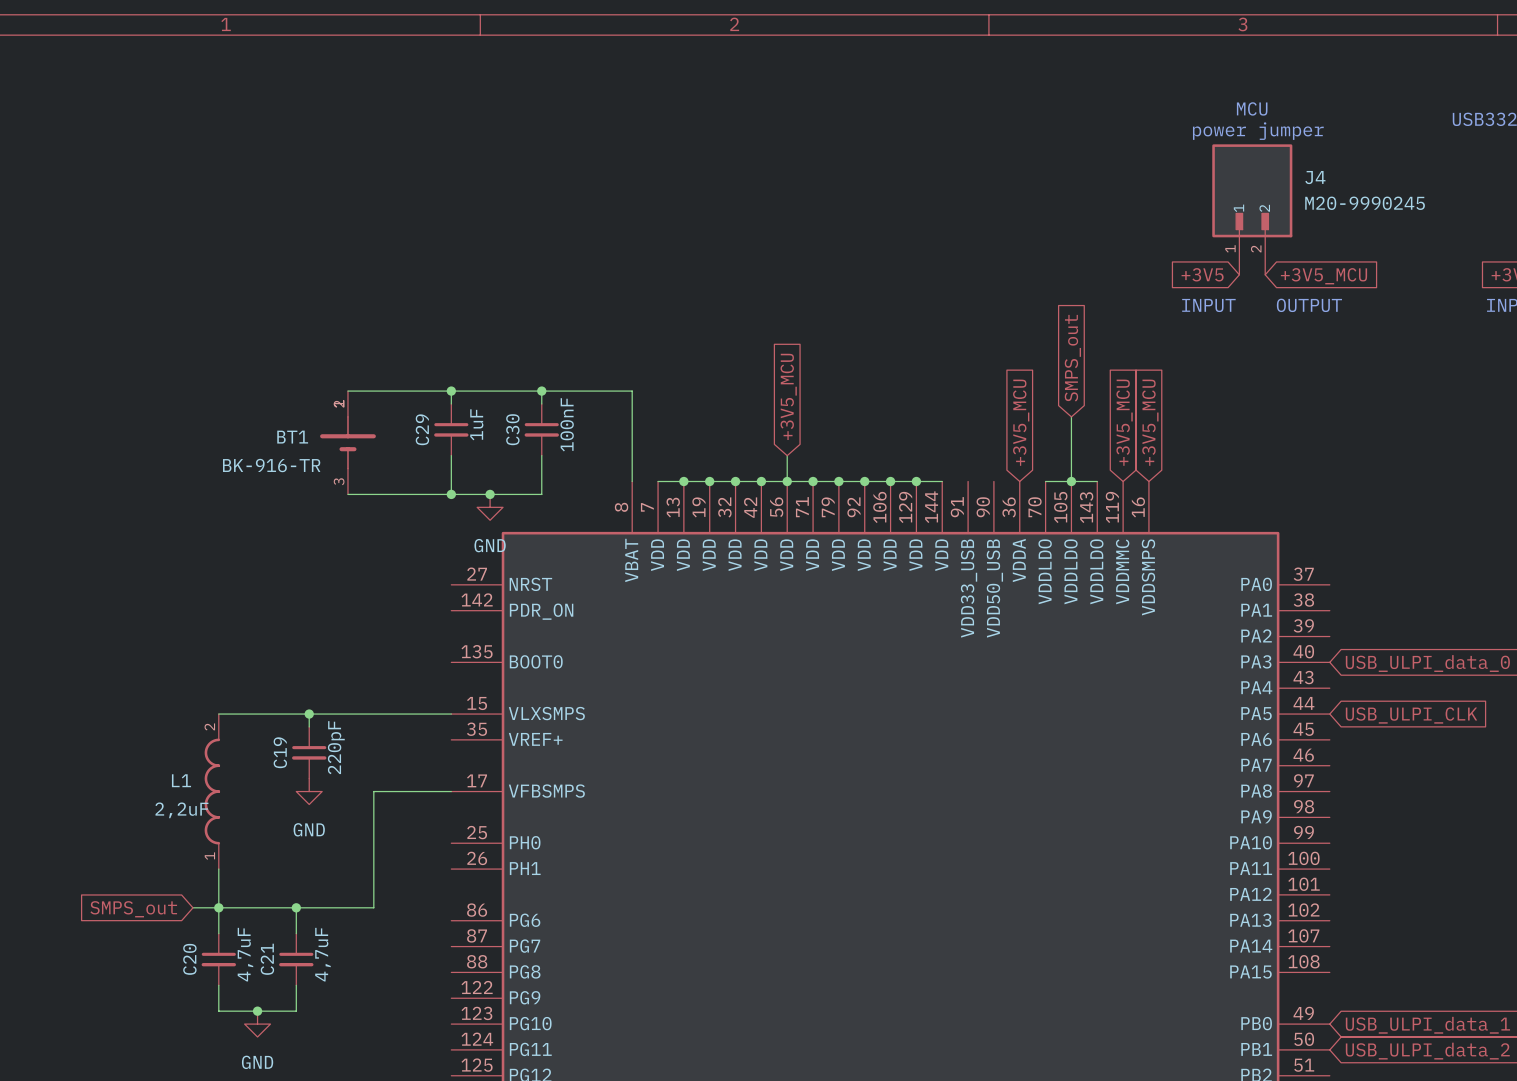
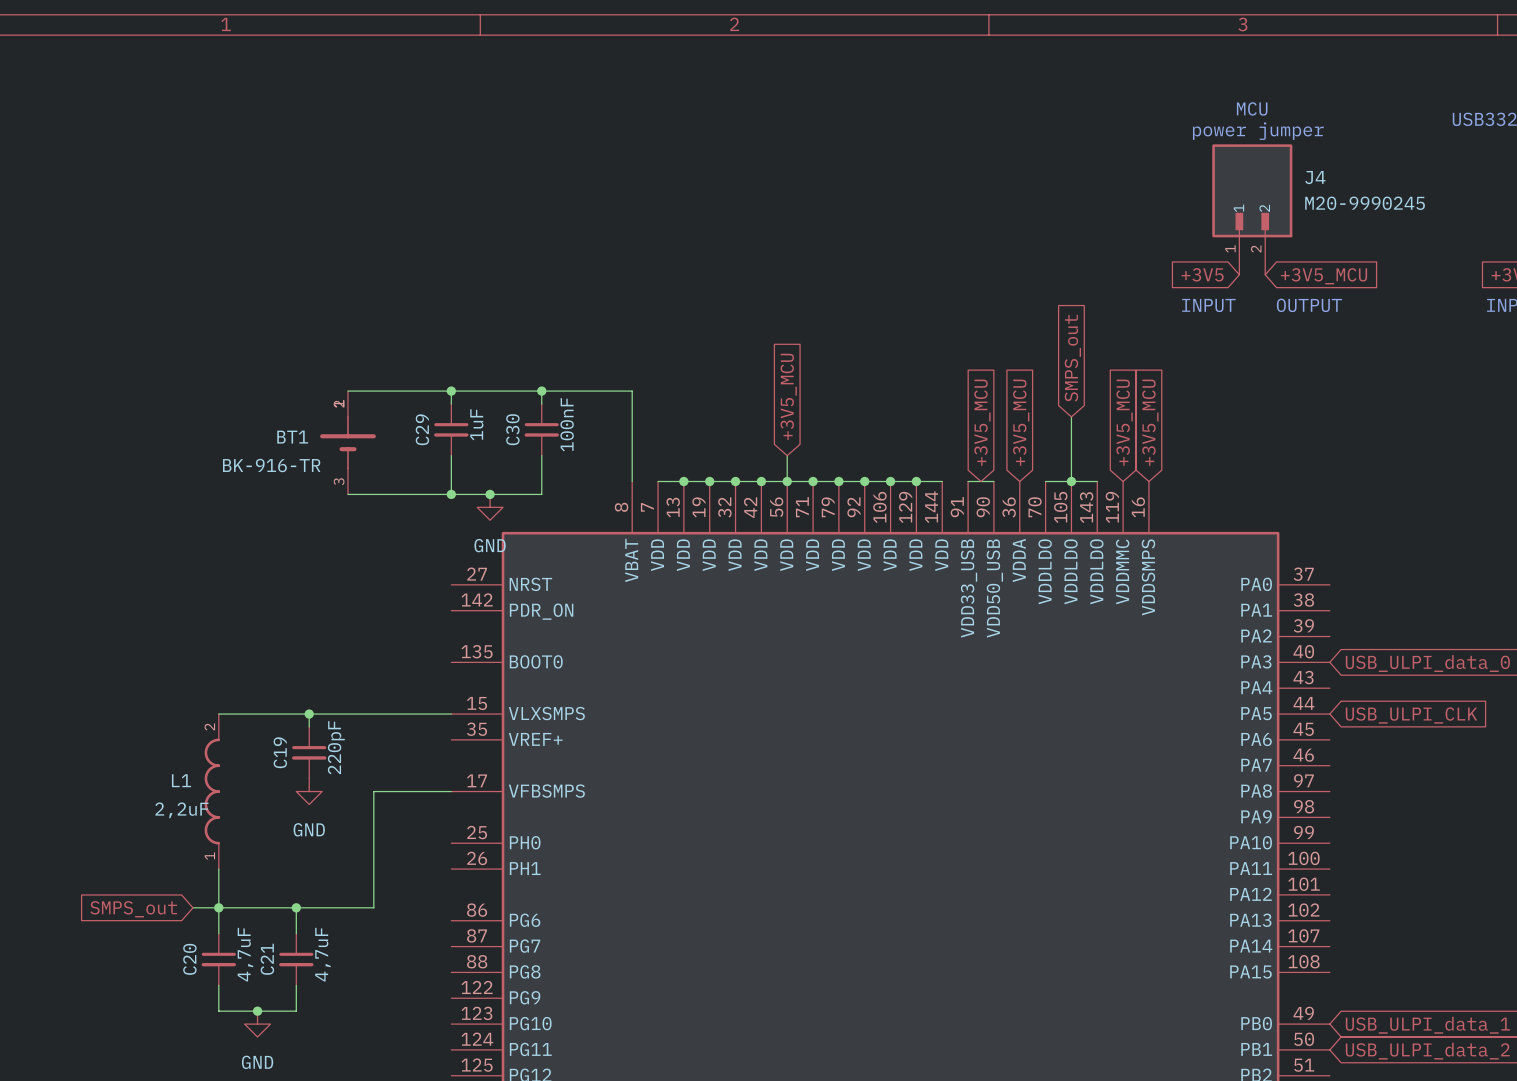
global label: none -> +3V5_MCU (982, 422)
wire: none -> (968, 481) (993, 481)

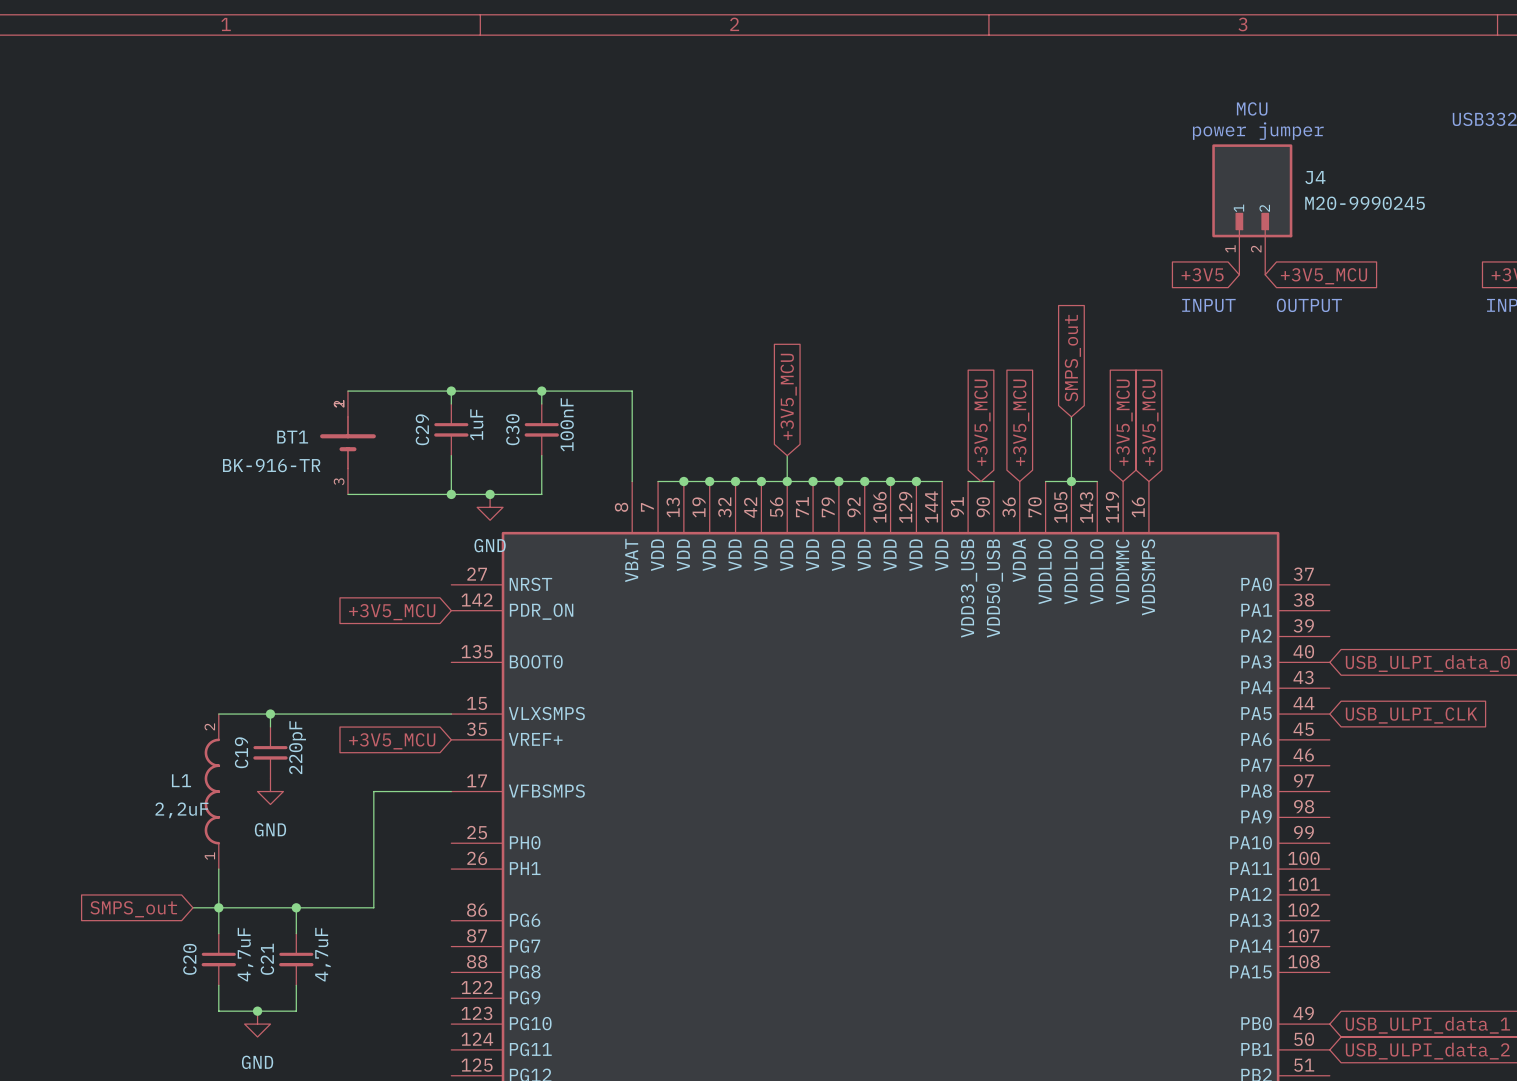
global label: none -> +3V5_MCU (392, 612)
wire: (309, 714) (309, 726) -> (270, 714) (270, 726)
junction position: (309, 714) -> (270, 714)
global label: none -> +3V5_MCU (392, 741)
C19 position: (309, 752) -> (270, 752)
power symbol position: GND (309, 791) -> GND (270, 791)

